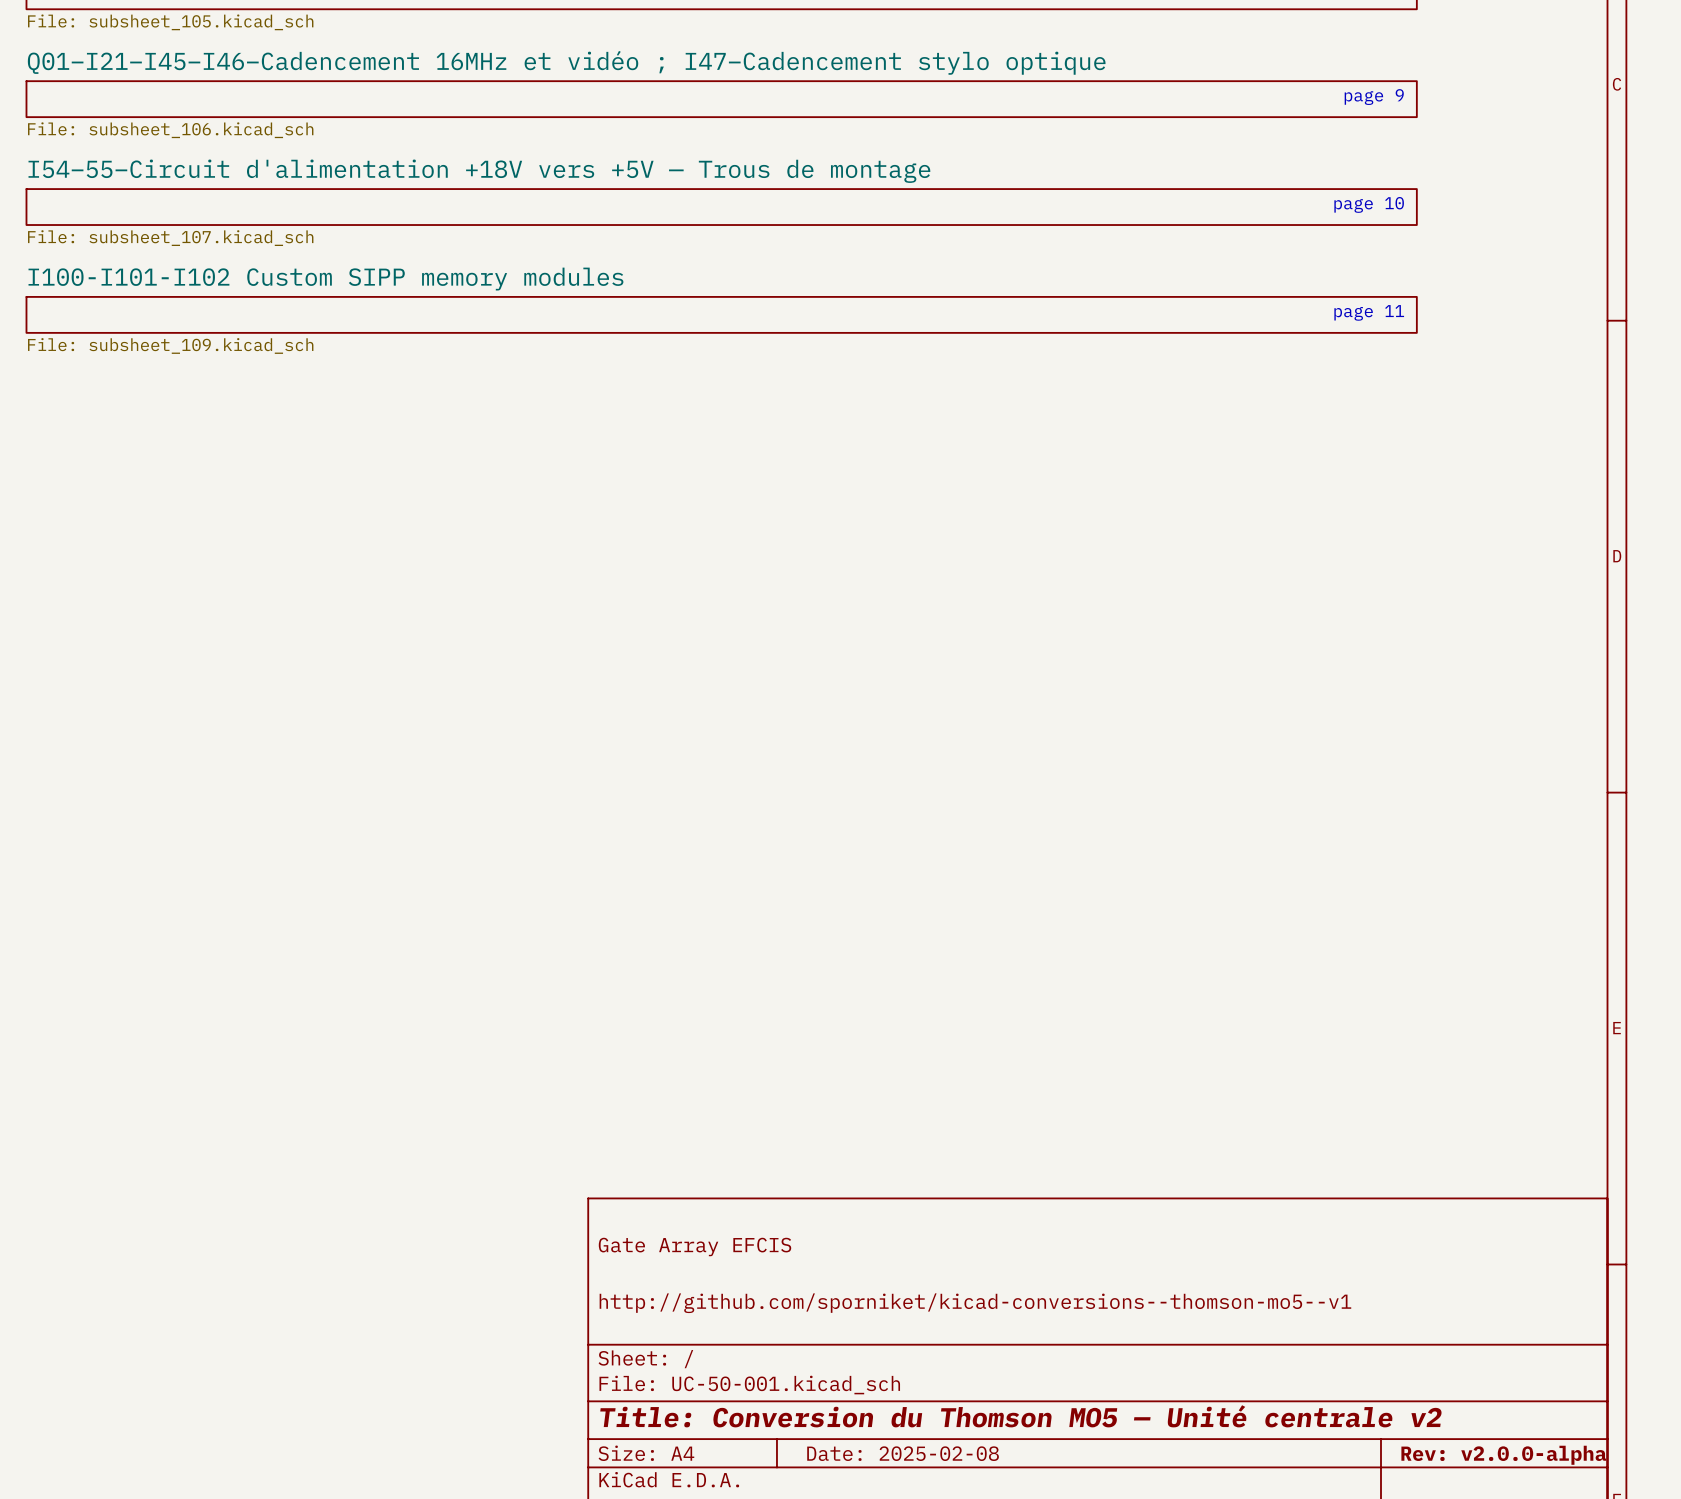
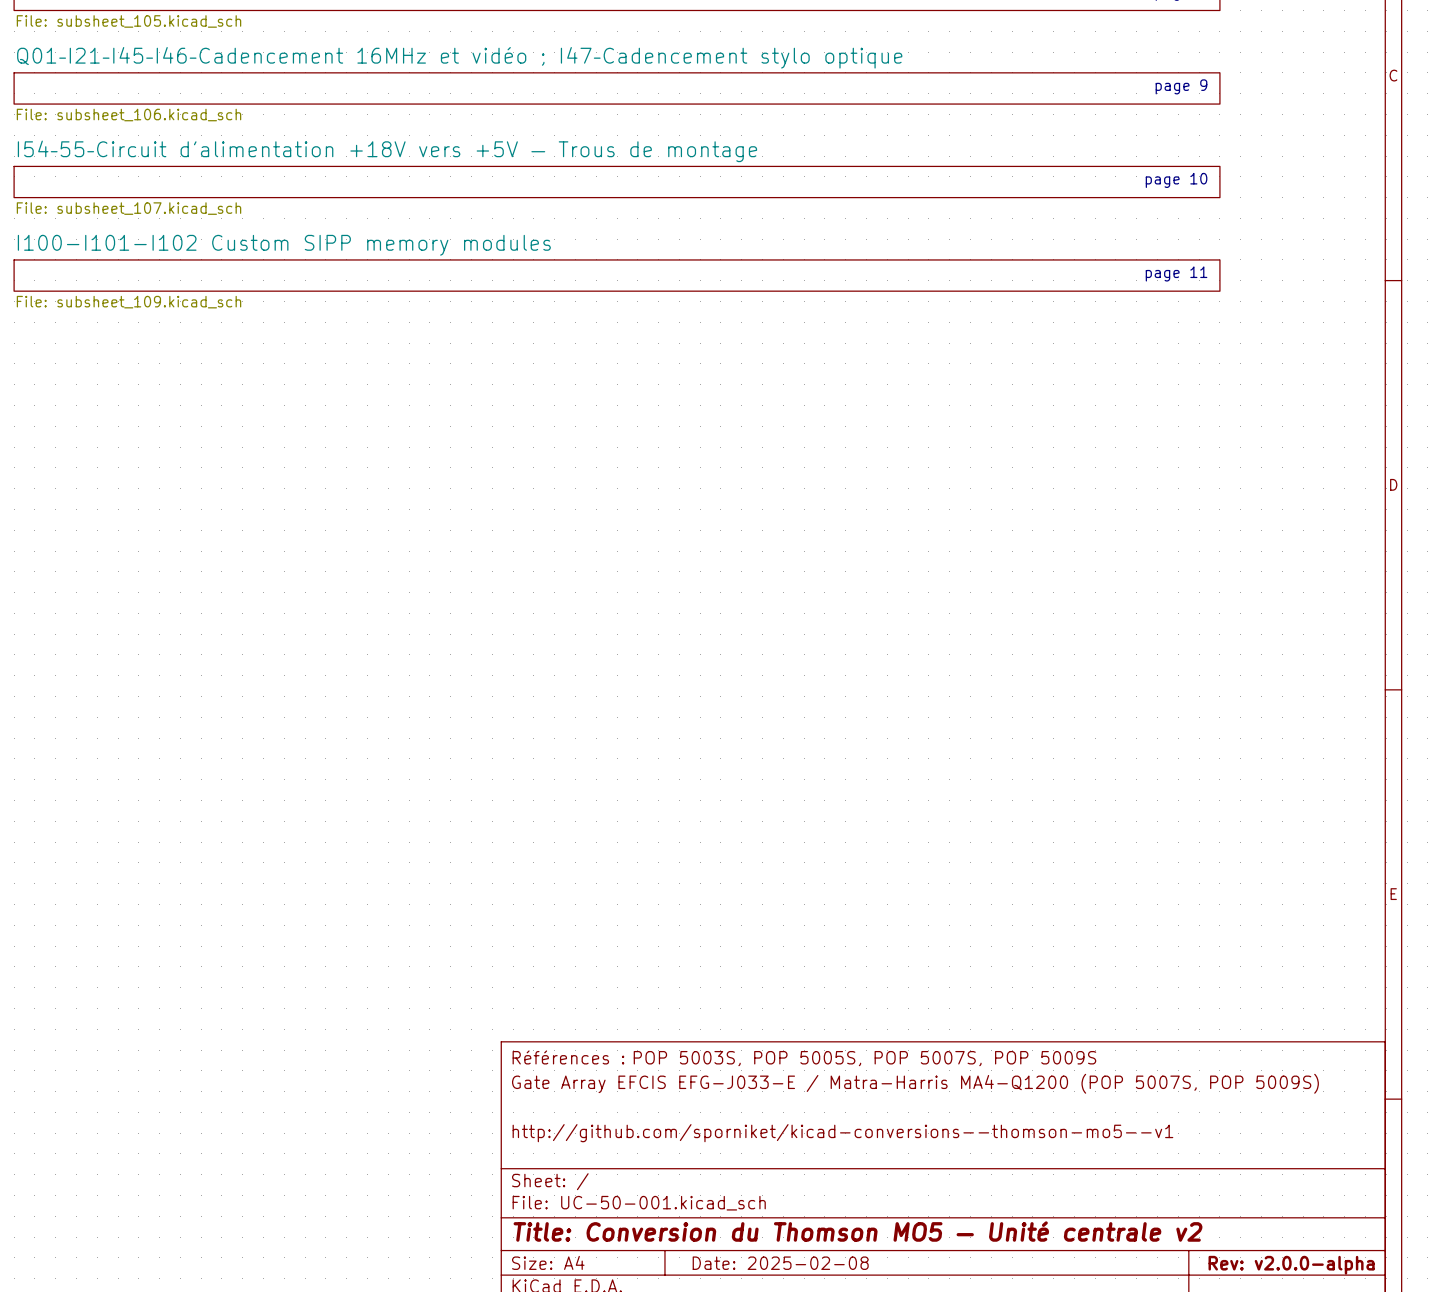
title block: none -> Références : POP 5003S, POP 5005S, POP 5007S, POP 5009S (804, 1058)
title block: Gate Array EFCIS (694, 1246) -> Gate Array EFCIS EFG-J033-E / Matra-Harris MA4-Q1200 (POP 5007S, POP 5009S) (915, 1083)

